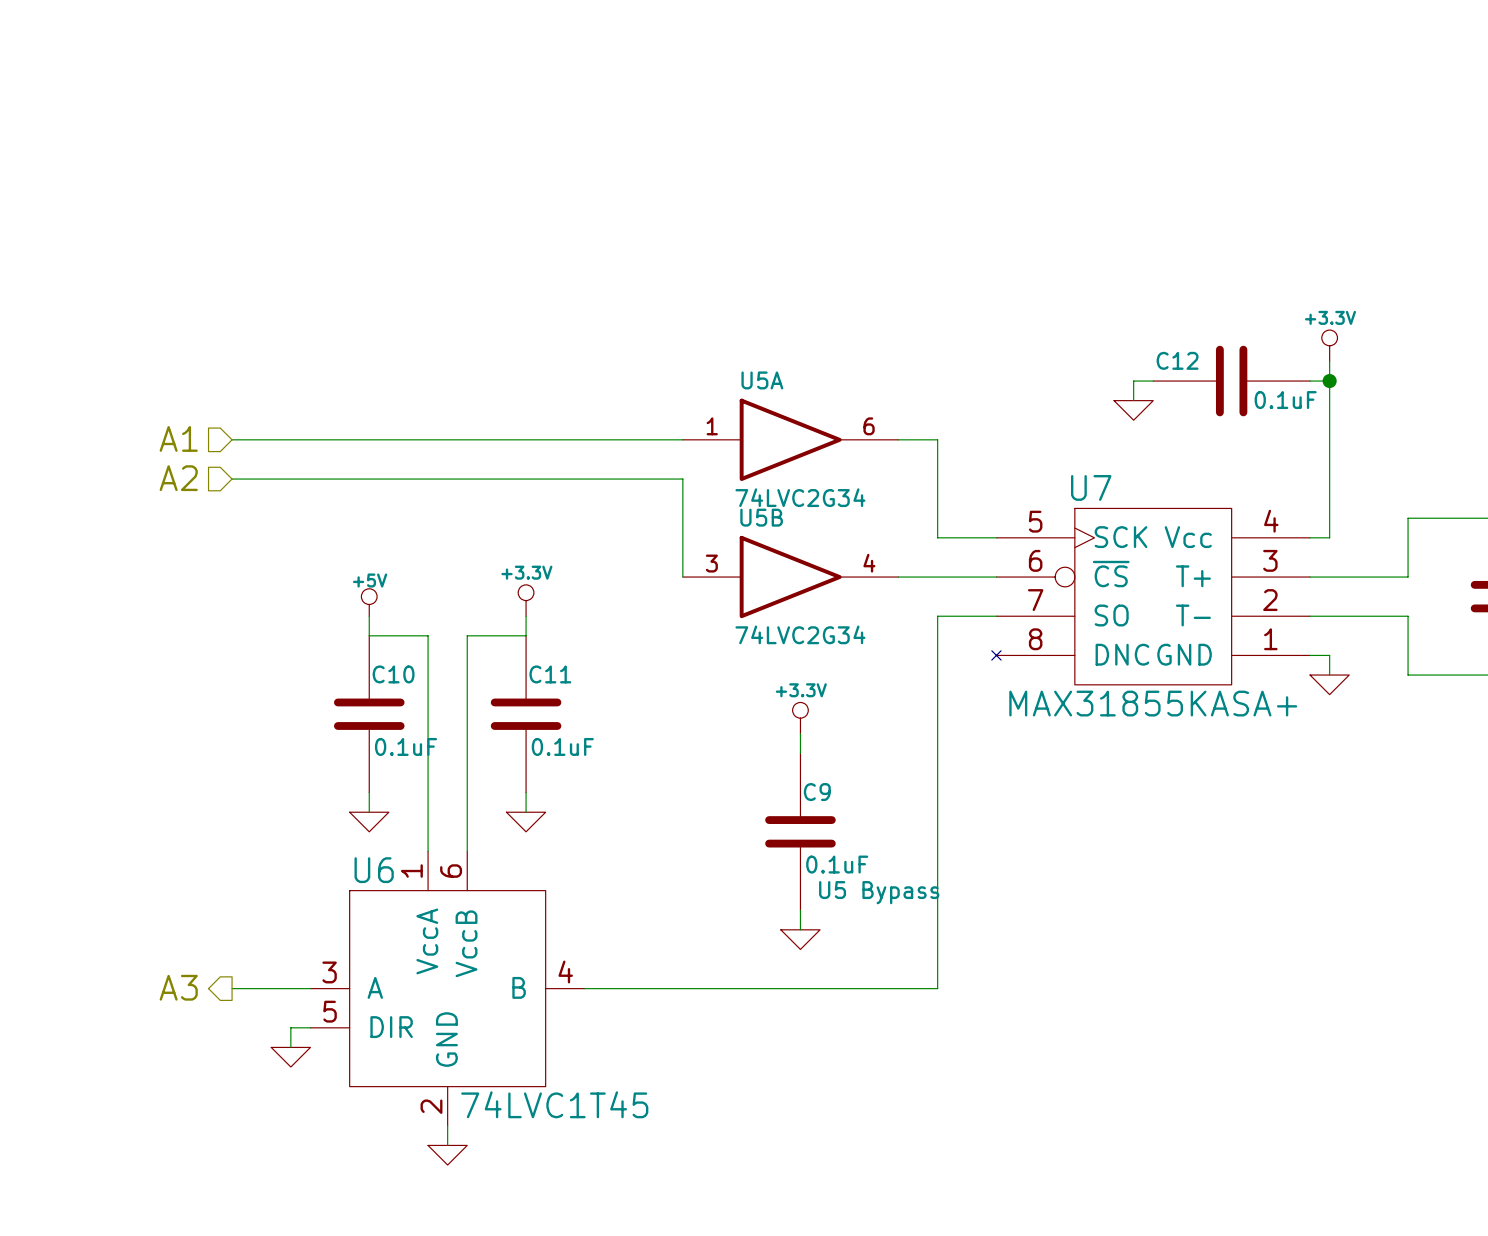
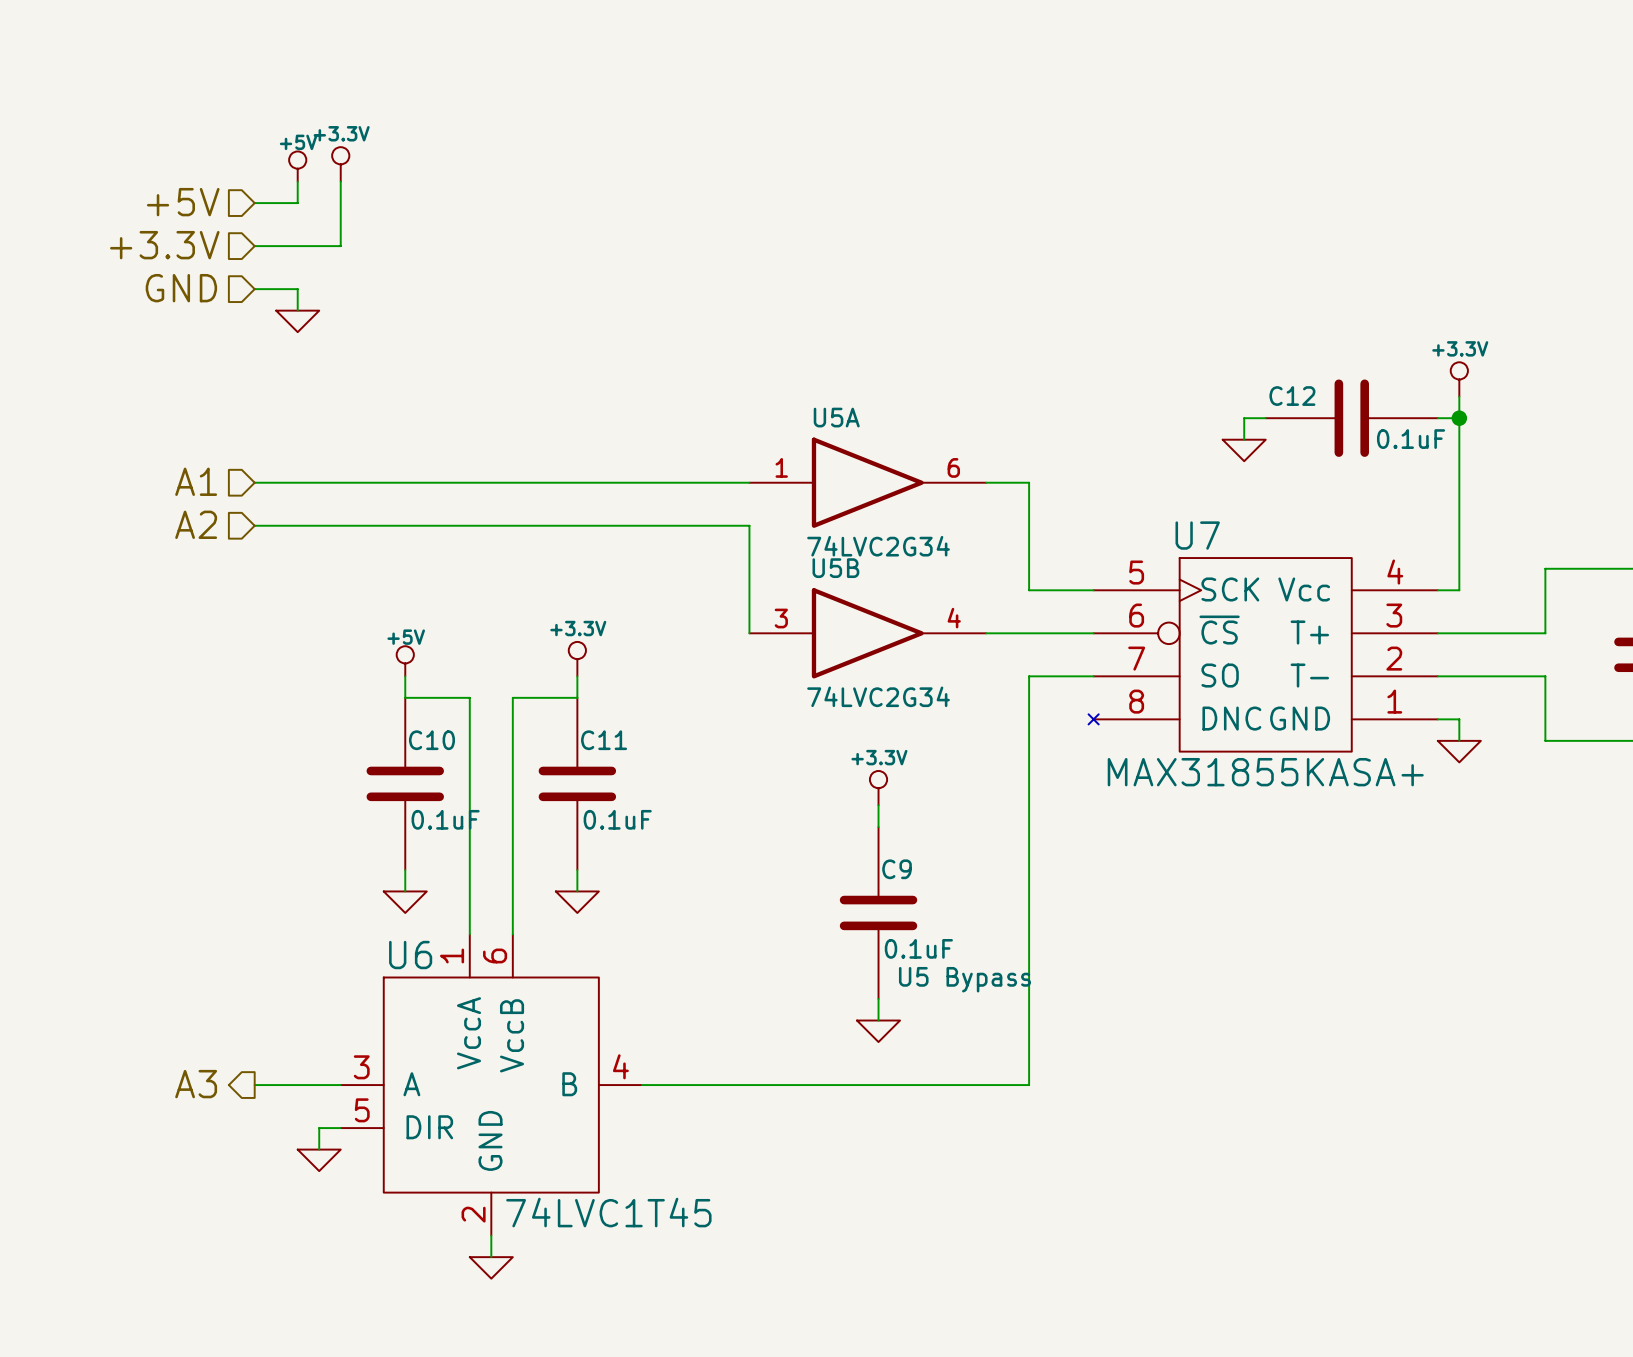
power symbol: none -> +3.3V (340, 164)
power symbol: none -> +5V (297, 166)
wire: none -> (297, 181) (297, 203) (254, 203)
wire: none -> (340, 181) (340, 246) (254, 246)
hierarchical label: none -> +5V (183, 202)
hierarchical label: none -> +3.3V (164, 245)
hierarchical label: none -> GND (181, 288)
wire: none -> (254, 289) (297, 289) (297, 310)
power symbol: none -> (297, 321)

